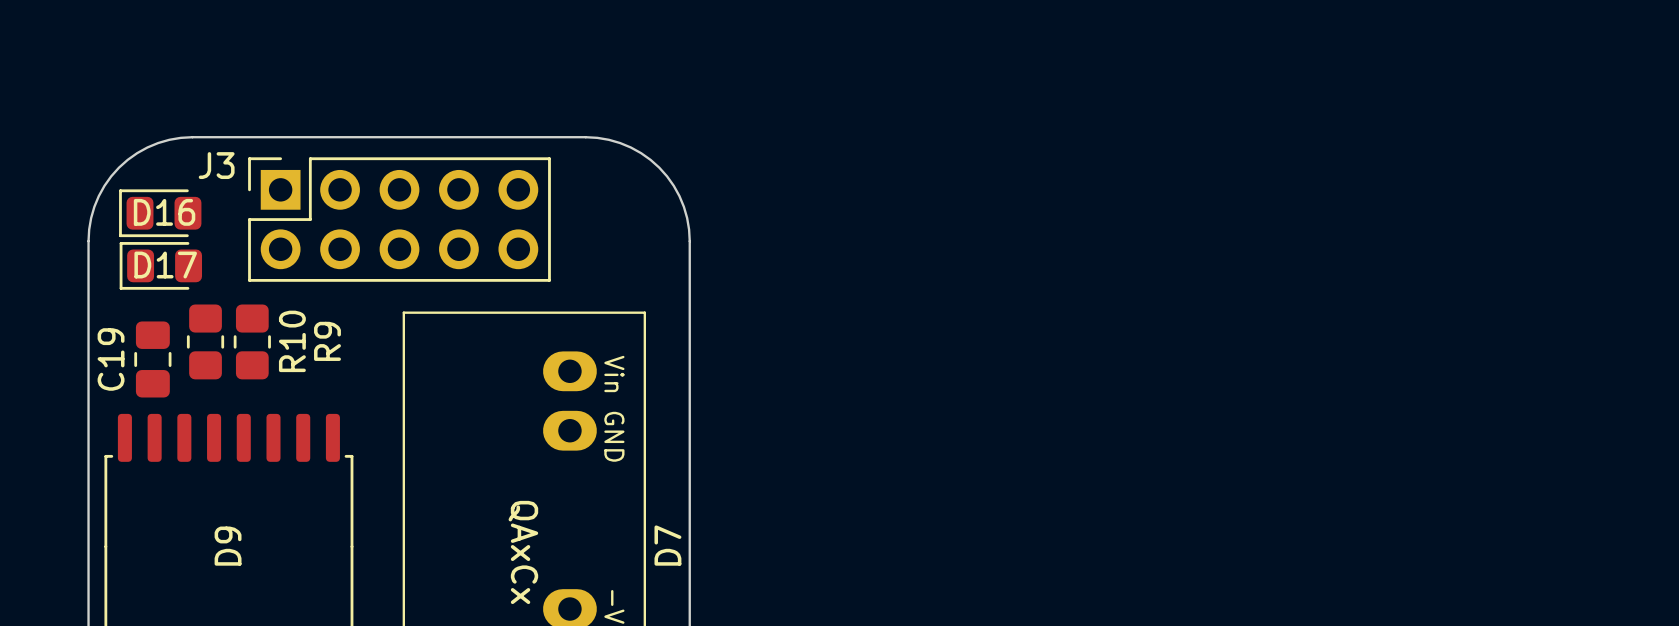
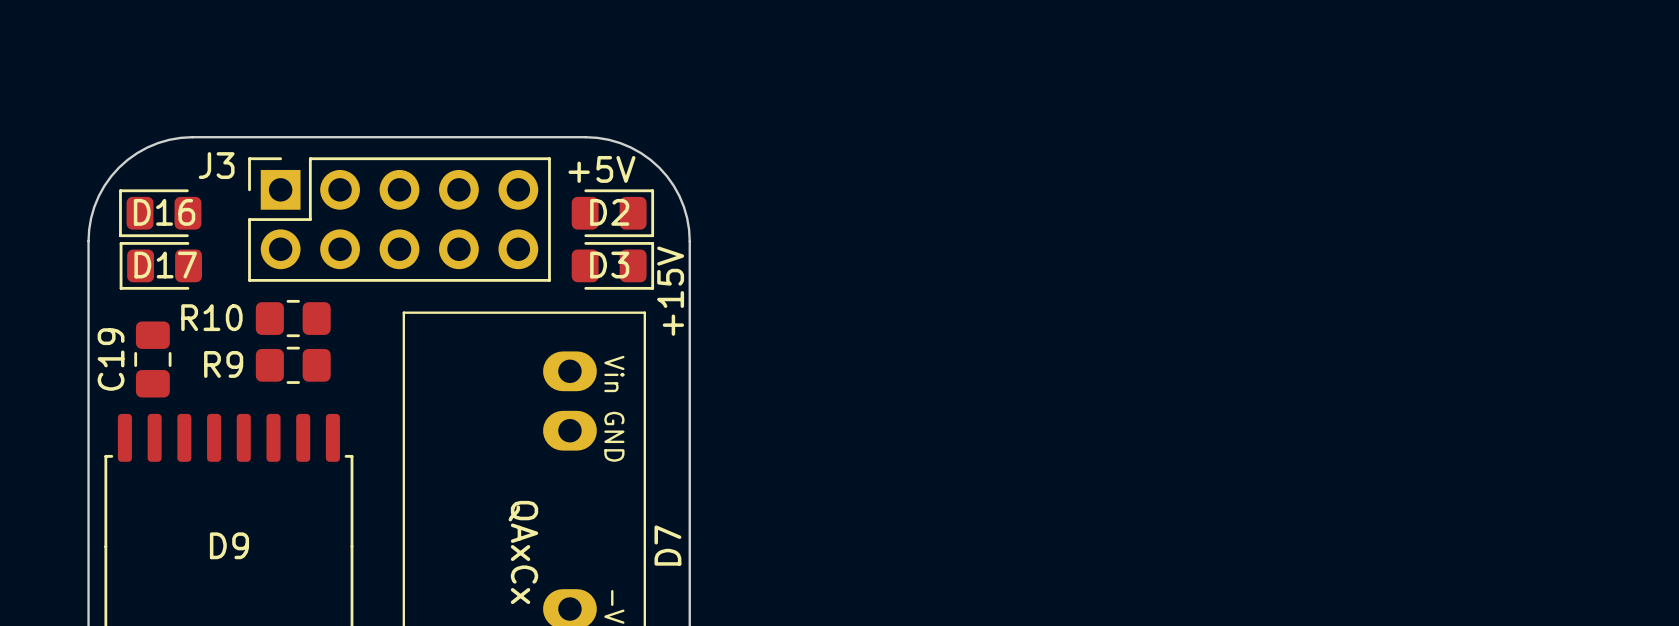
text: none -> +5V (601, 169)
D2: none -> (612, 213)
D3: none -> (612, 265)
text: none -> +15V (670, 291)
R10 rotation: 0° (205, 341) -> 90° clockwise (293, 318)
R10 position: (205, 341) -> (293, 318)
R9 rotation: 0° (252, 341) -> 90° clockwise (293, 365)
R9 position: (252, 341) -> (293, 365)
R10 name position: R10 (292, 341) -> R10 (211, 317)
R9 name position: R9 (327, 341) -> R9 (223, 364)
D9 name rotation: 0° (228, 546) -> 90° clockwise (229, 545)

